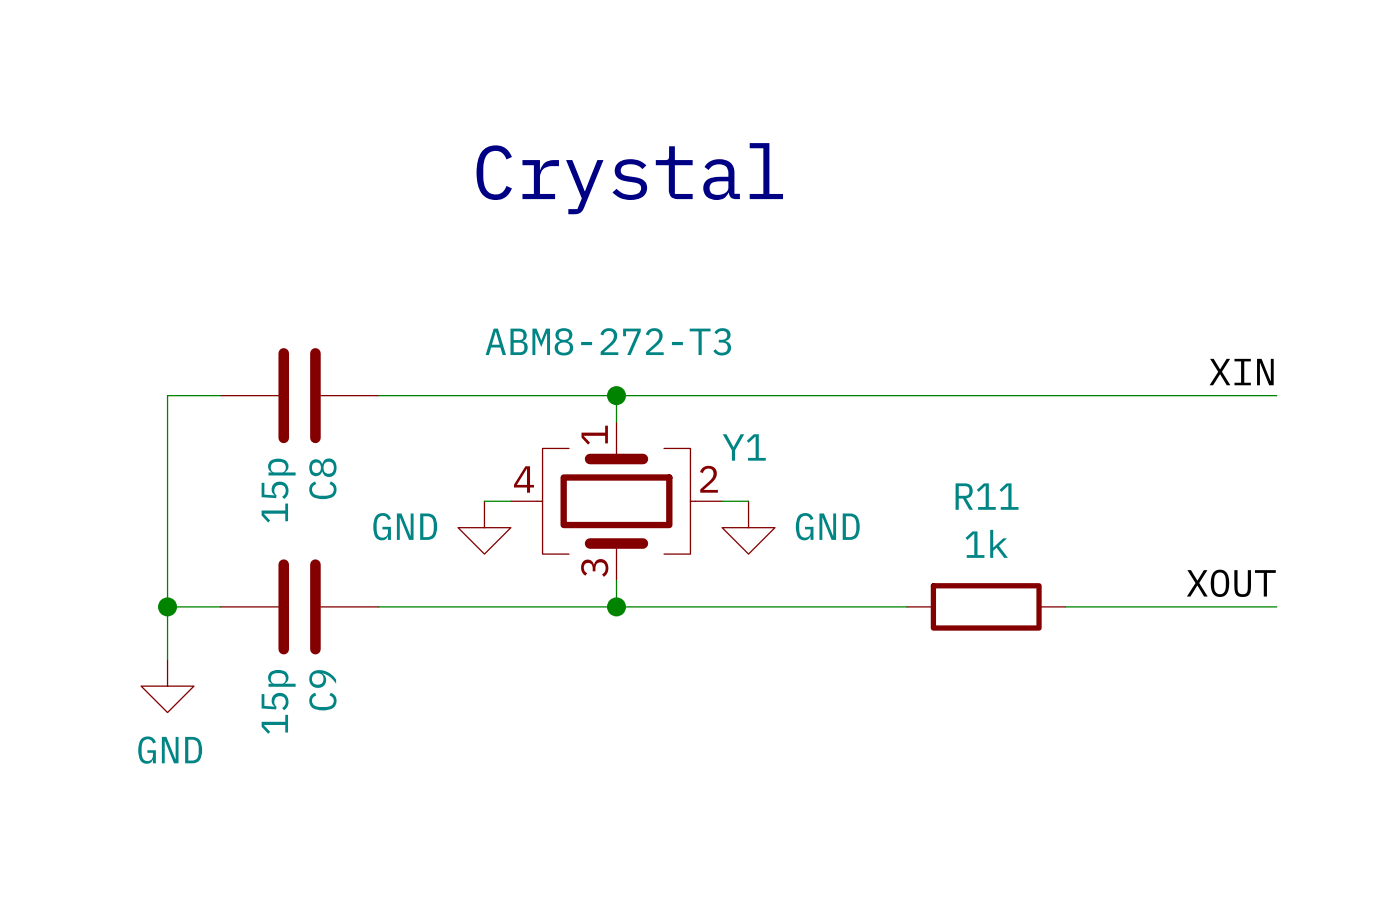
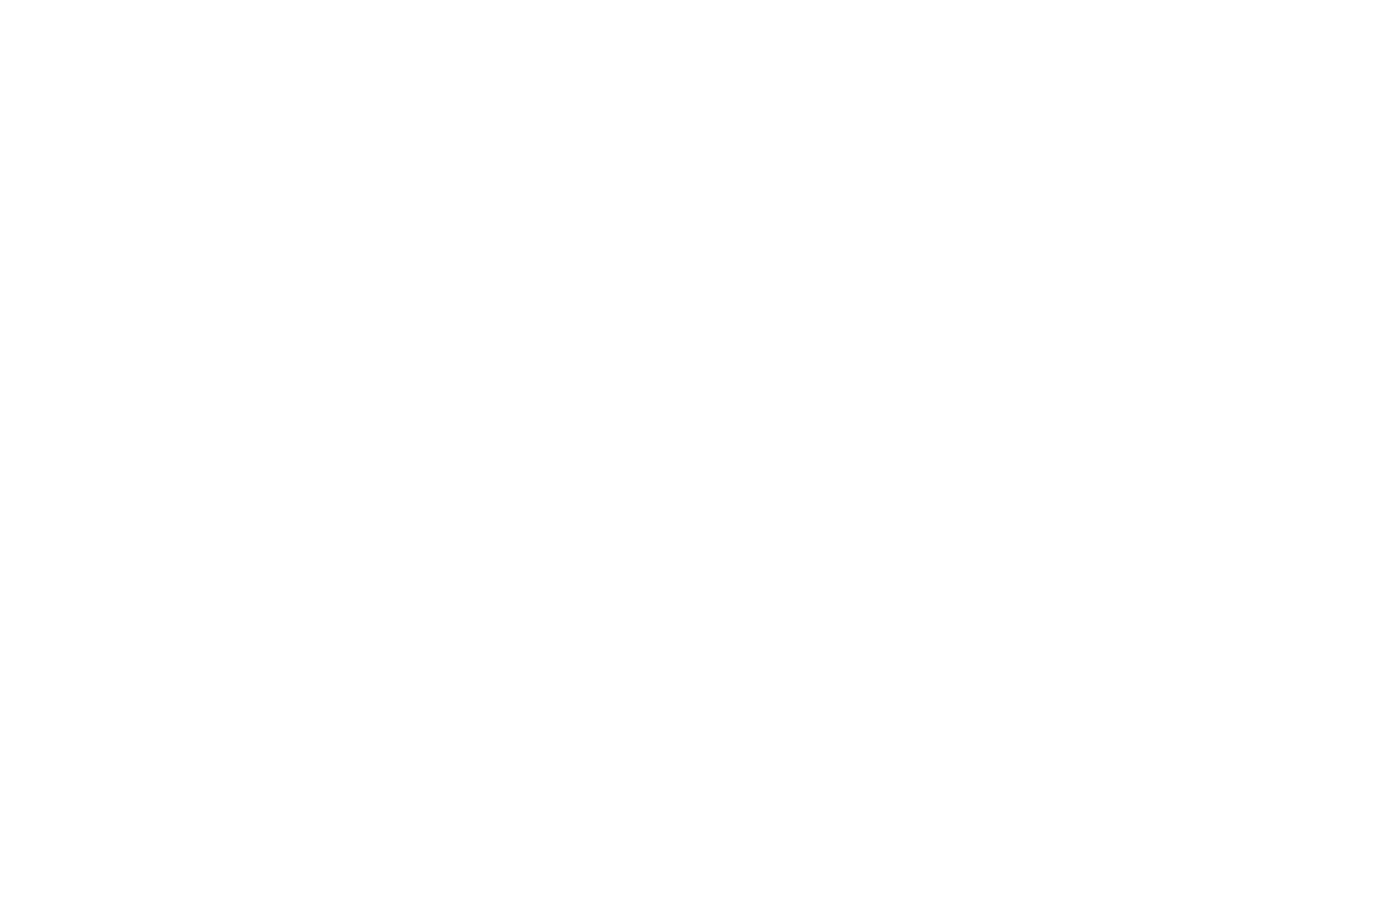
text: Crystal (629, 178) -> none
label: XIN (1241, 372) -> none
wire: (220, 395) (167, 395) (167, 659) -> none
C8: 15p (299, 395) -> none
wire: (378, 395) (1276, 395) -> none
wire: (616, 395) (616, 422) -> none
junction: (616, 395) -> none
wire: (484, 501) (510, 501) -> none
Y1: ABM8-272-T3 (616, 501) -> none
wire: (722, 501) (748, 501) -> none
power symbol: GND (484, 527) -> none
power symbol: GND (748, 527) -> none
wire: (616, 580) (616, 606) -> none
label: XOUT (1231, 583) -> none
wire: (167, 606) (220, 606) -> none
junction: (167, 606) -> none
C9: 15p (299, 606) -> none
wire: (378, 606) (906, 606) -> none
junction: (616, 606) -> none
R11: 1k (986, 606) -> none
wire: (1065, 606) (1276, 606) -> none
power symbol: GND (167, 686) -> none

